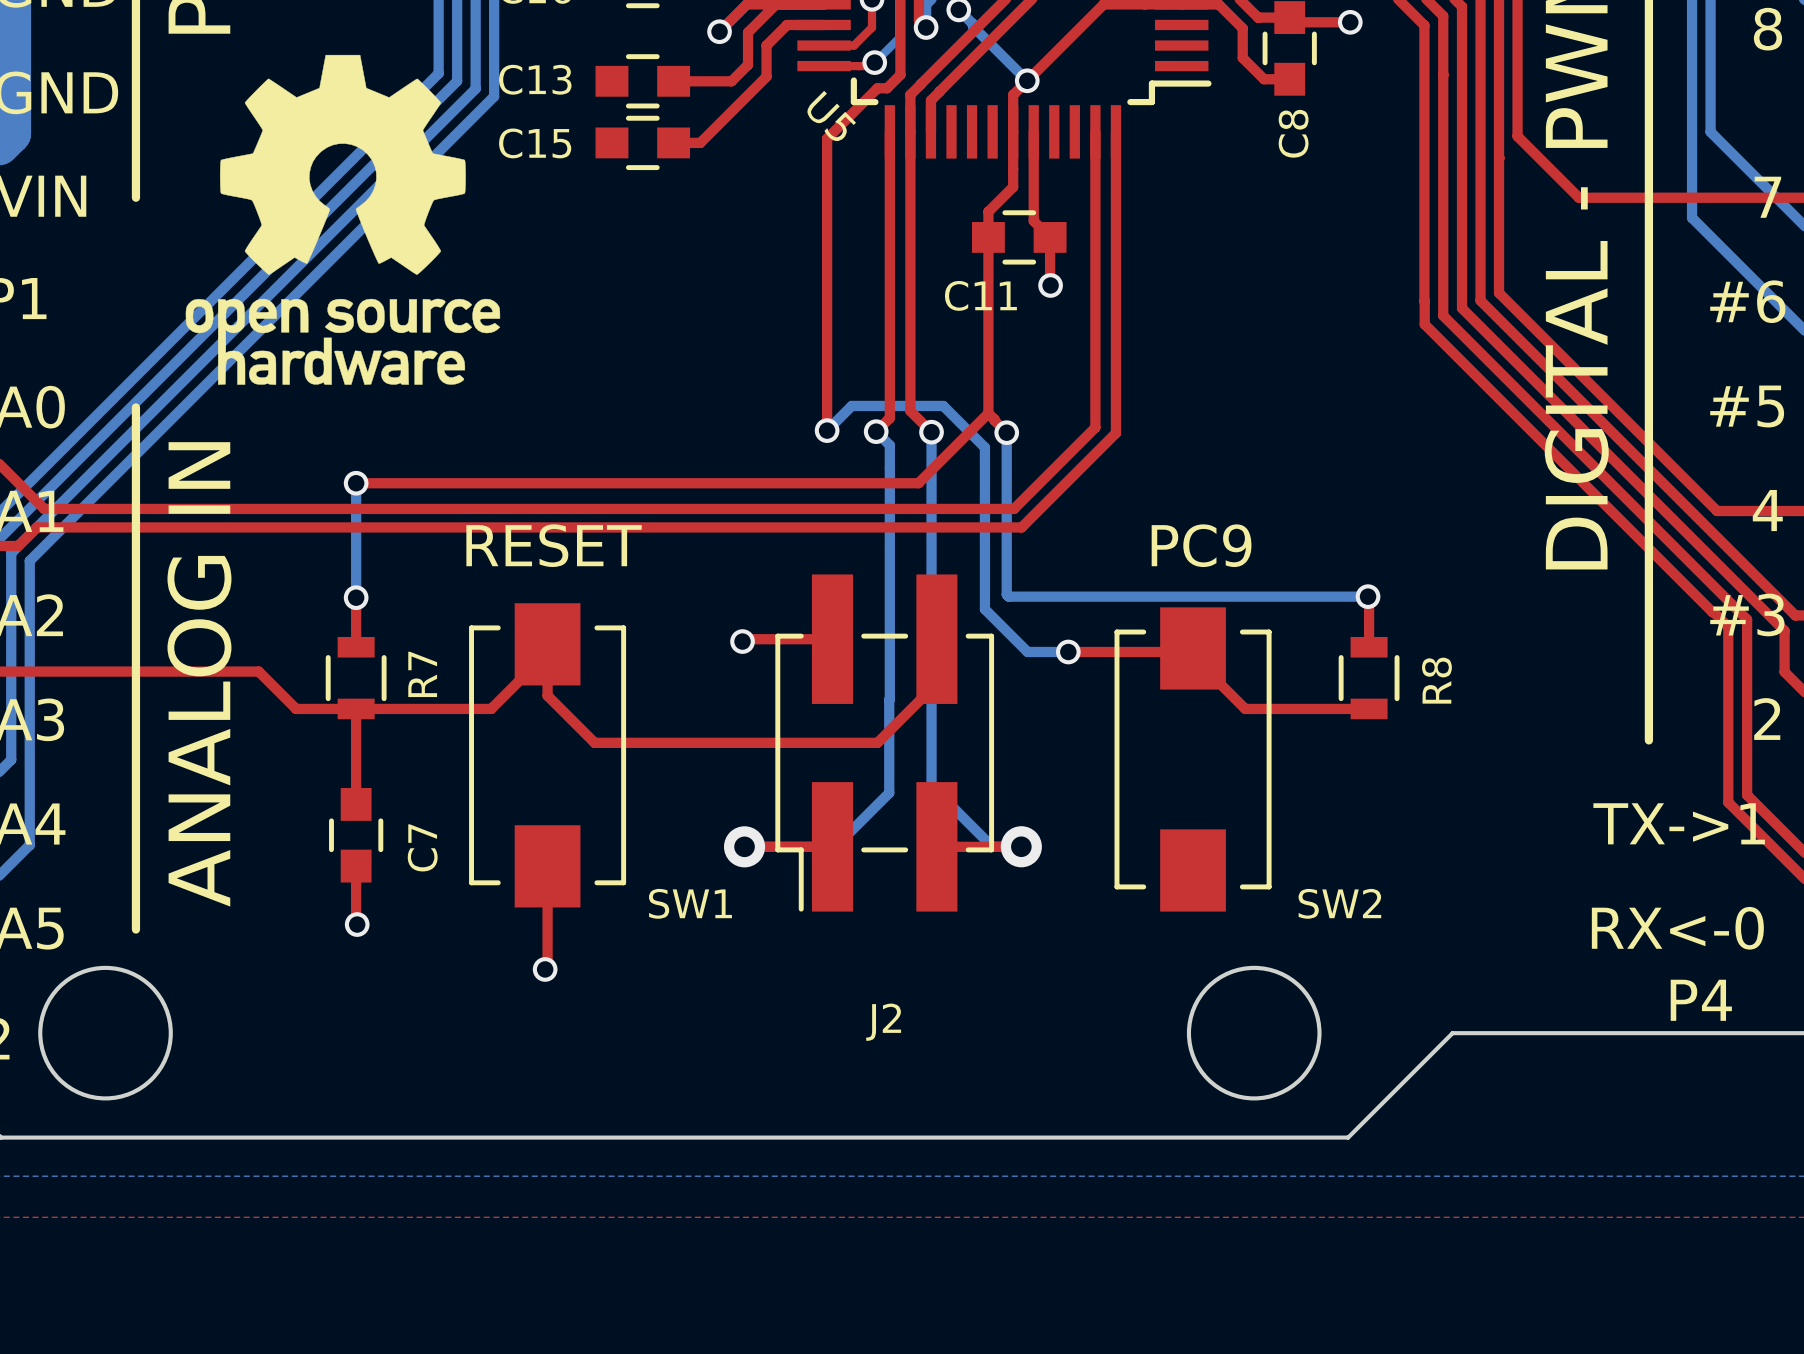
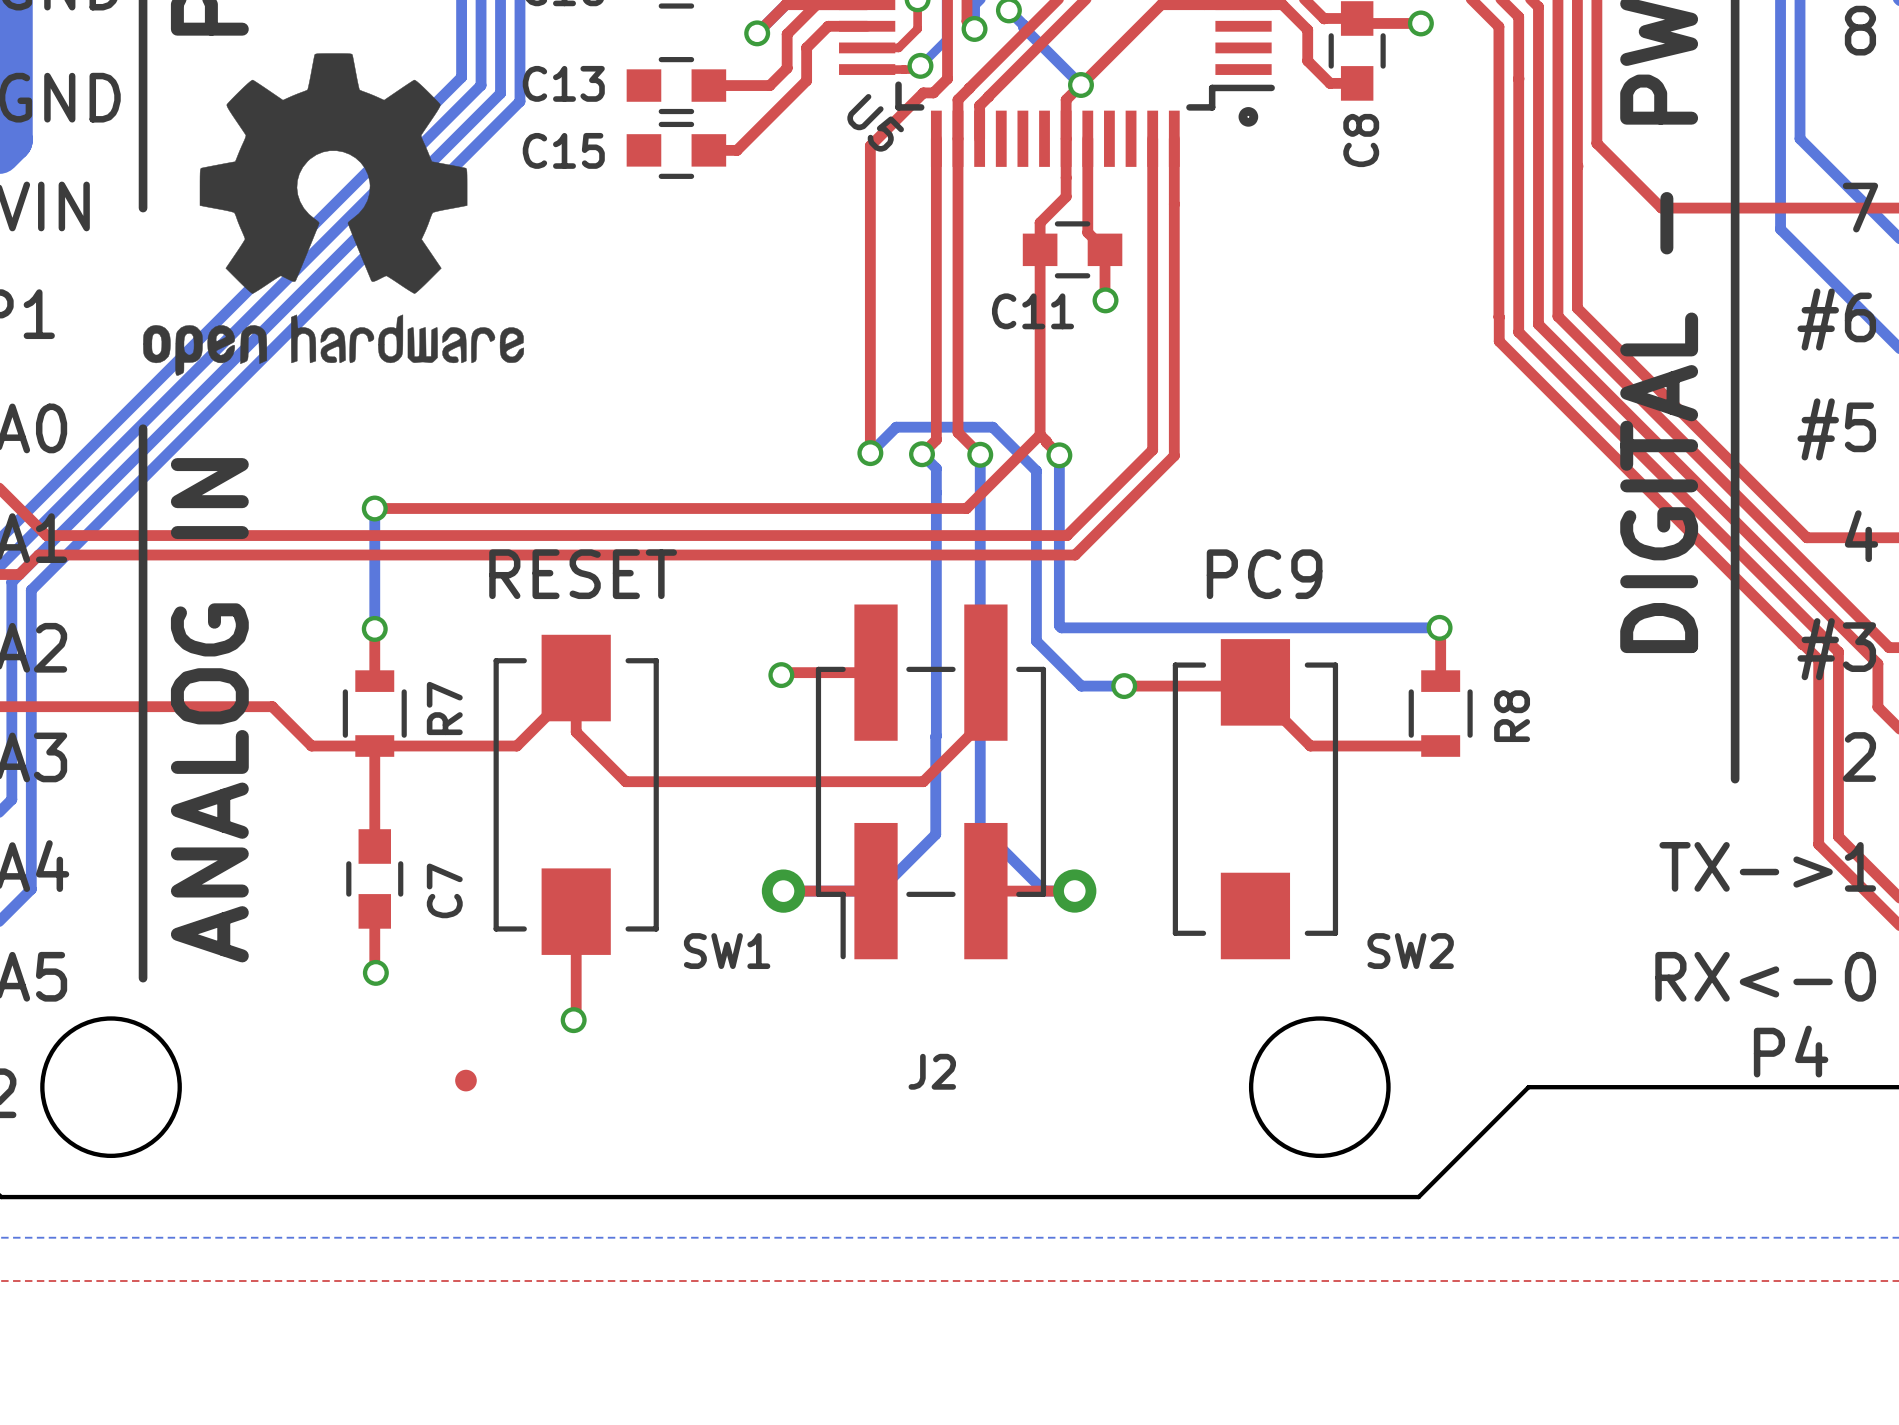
drawing shape: [185, 54, 501, 385] -> [143, 53, 524, 376]
drawing: none -> [1238, 107, 1259, 127]
part: none -> (465, 1080)

